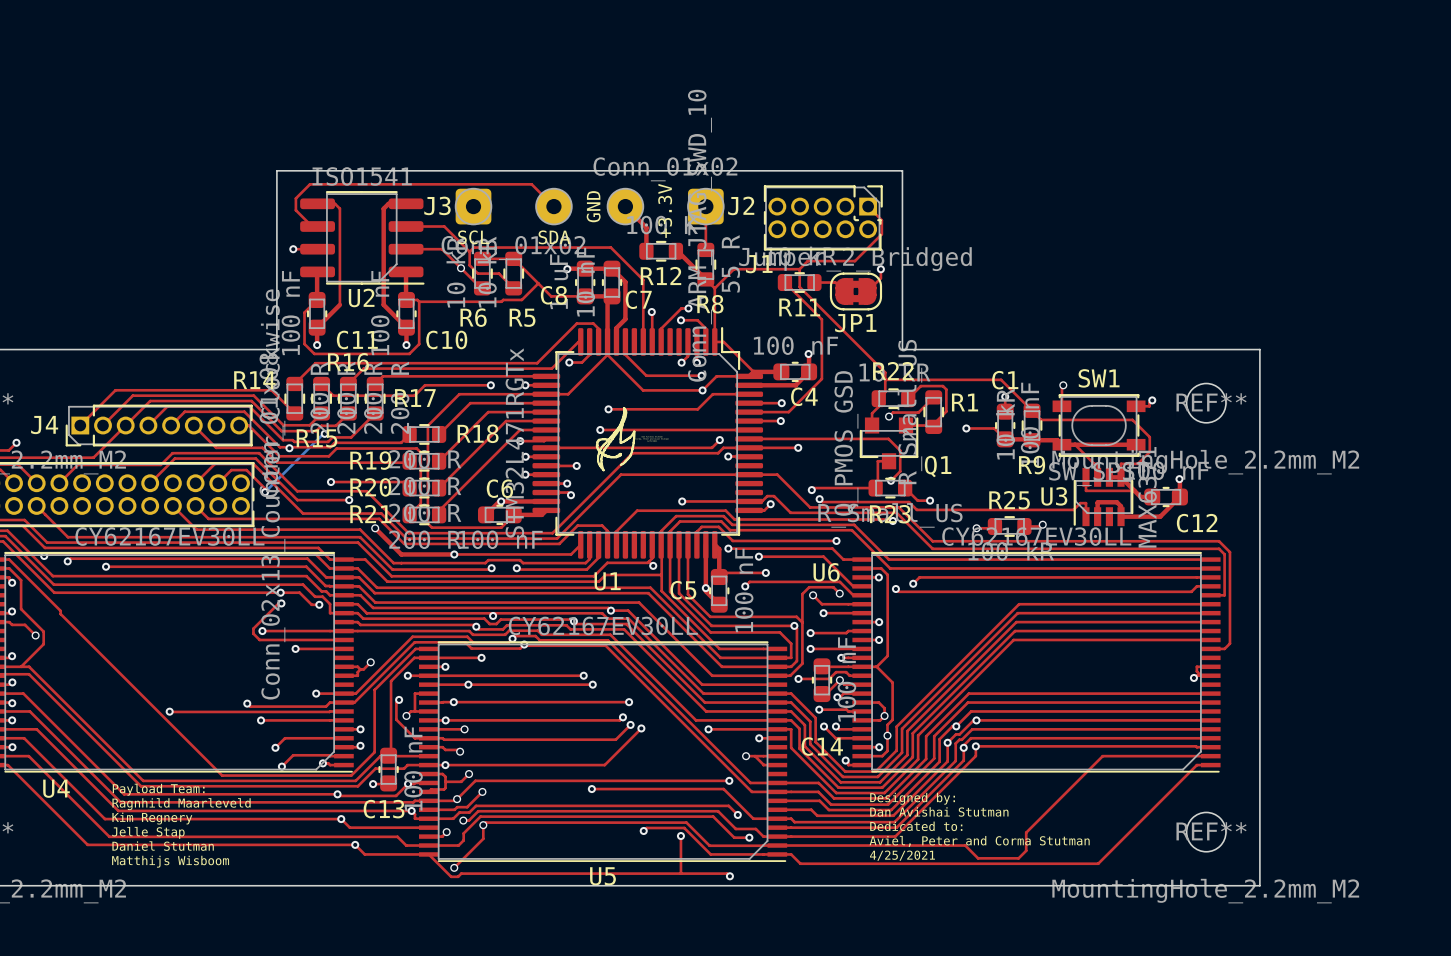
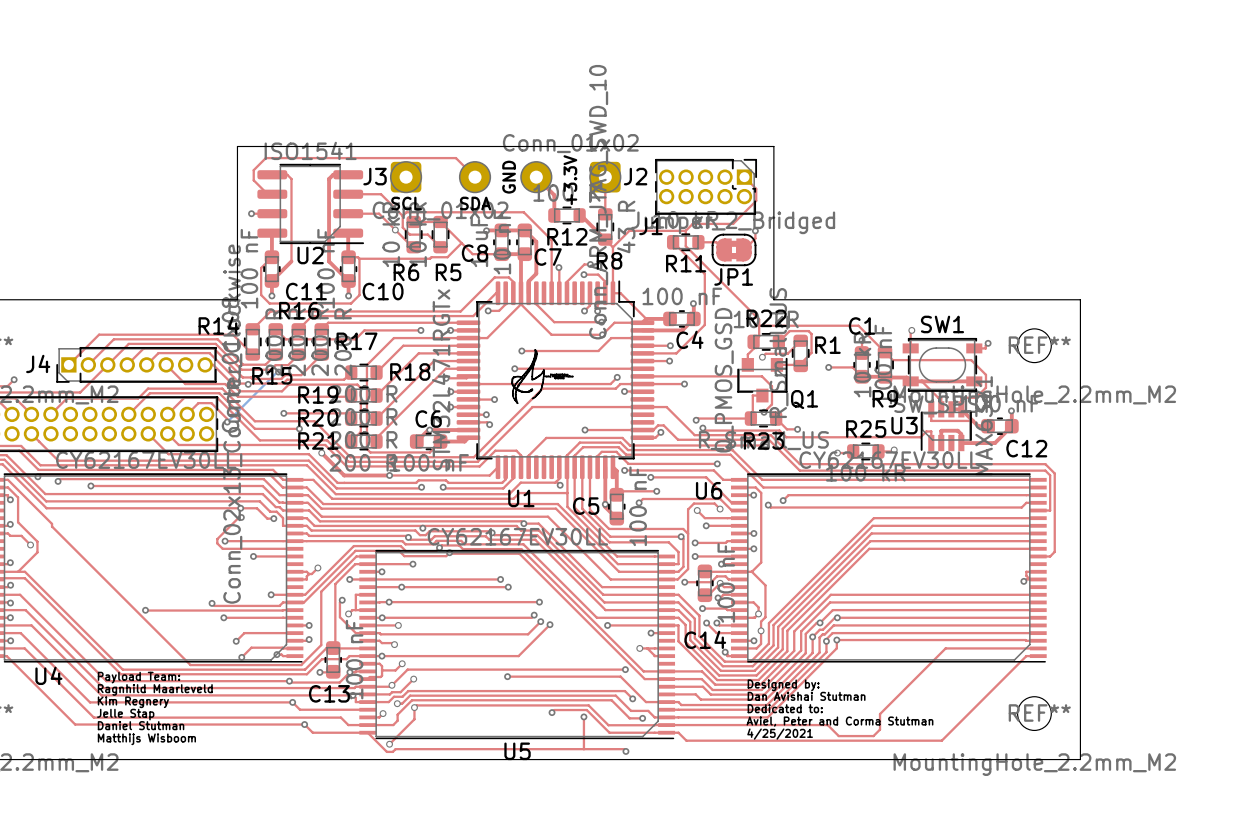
R8 value: 55 R (730, 263) -> 43 R (626, 226)

